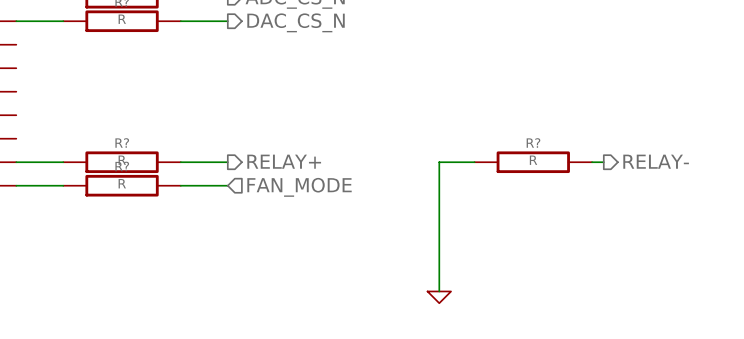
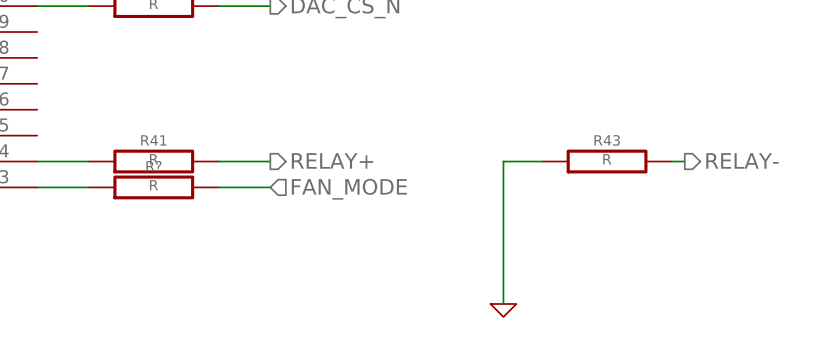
R? name: R? (122, 142) -> R41 (153, 140)
R? name: R? (533, 142) -> R43 (607, 140)

